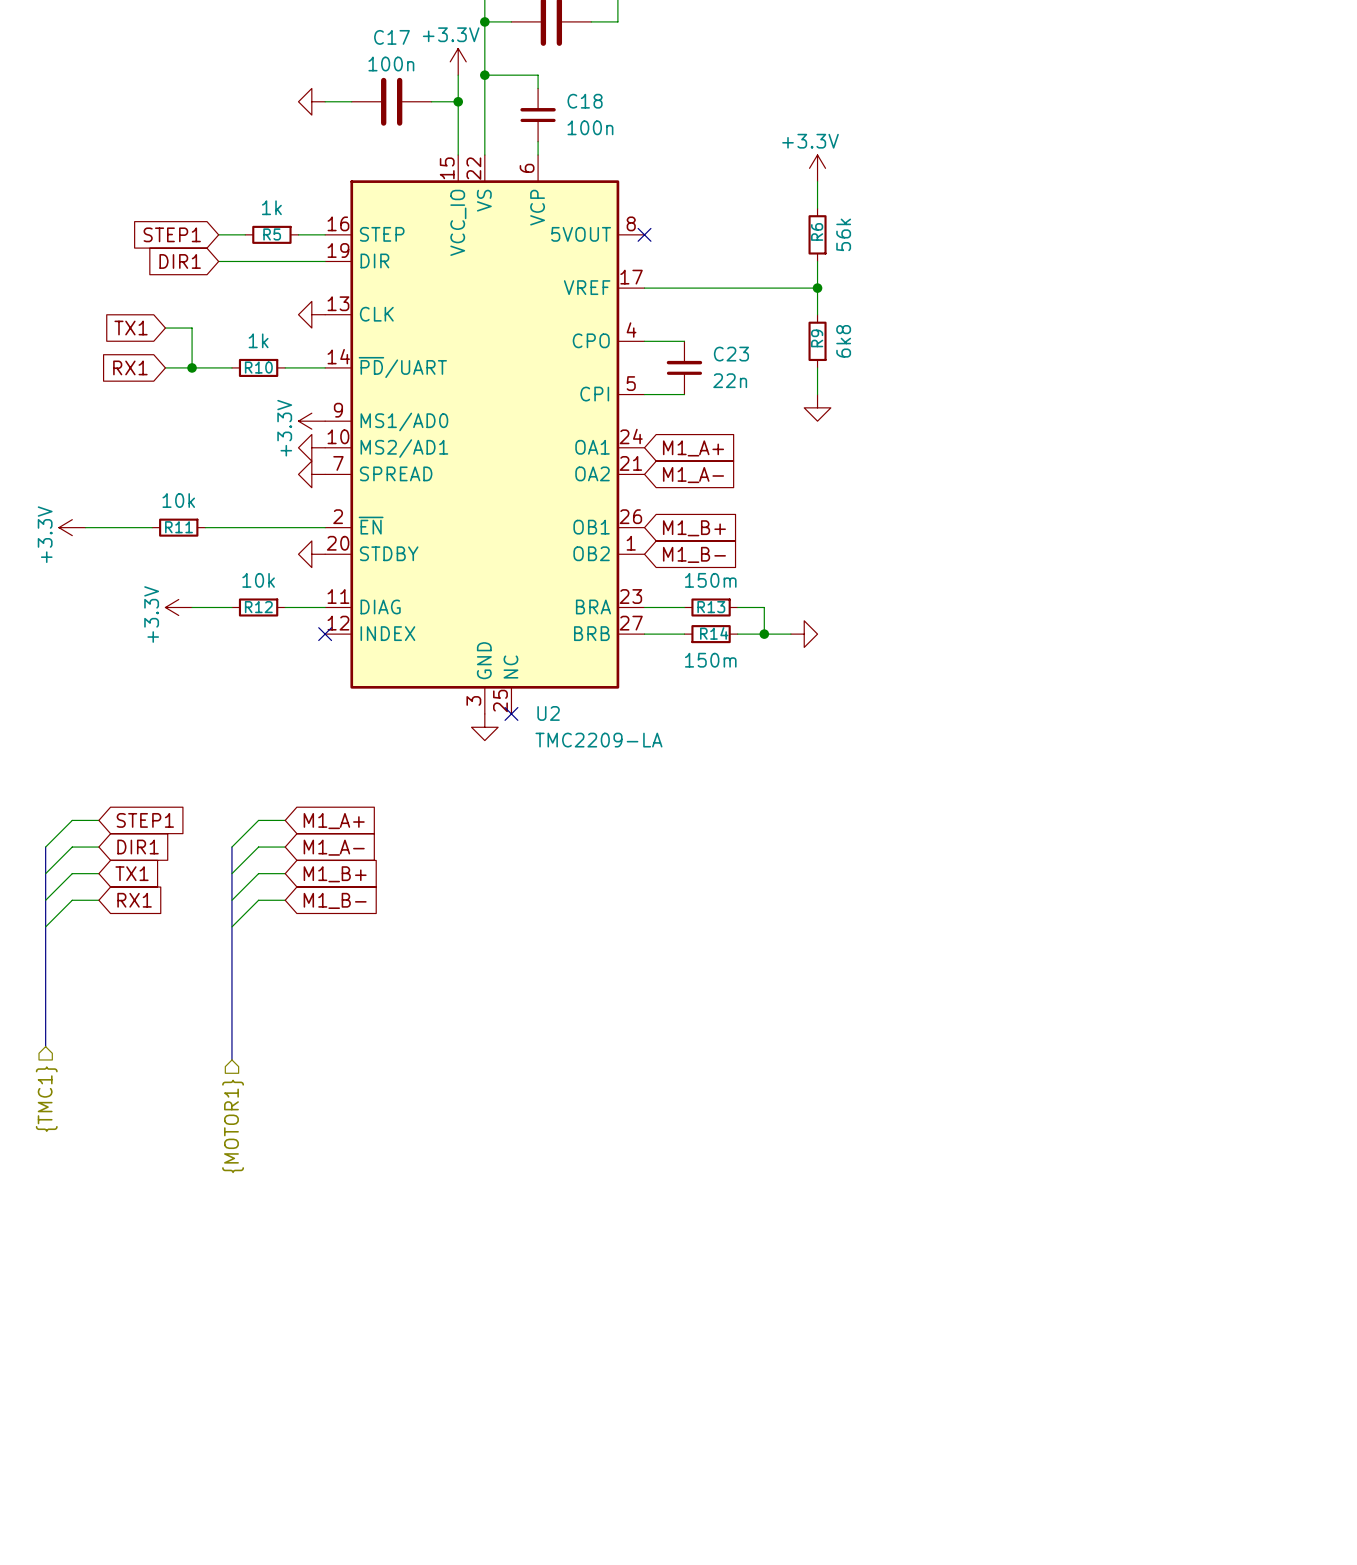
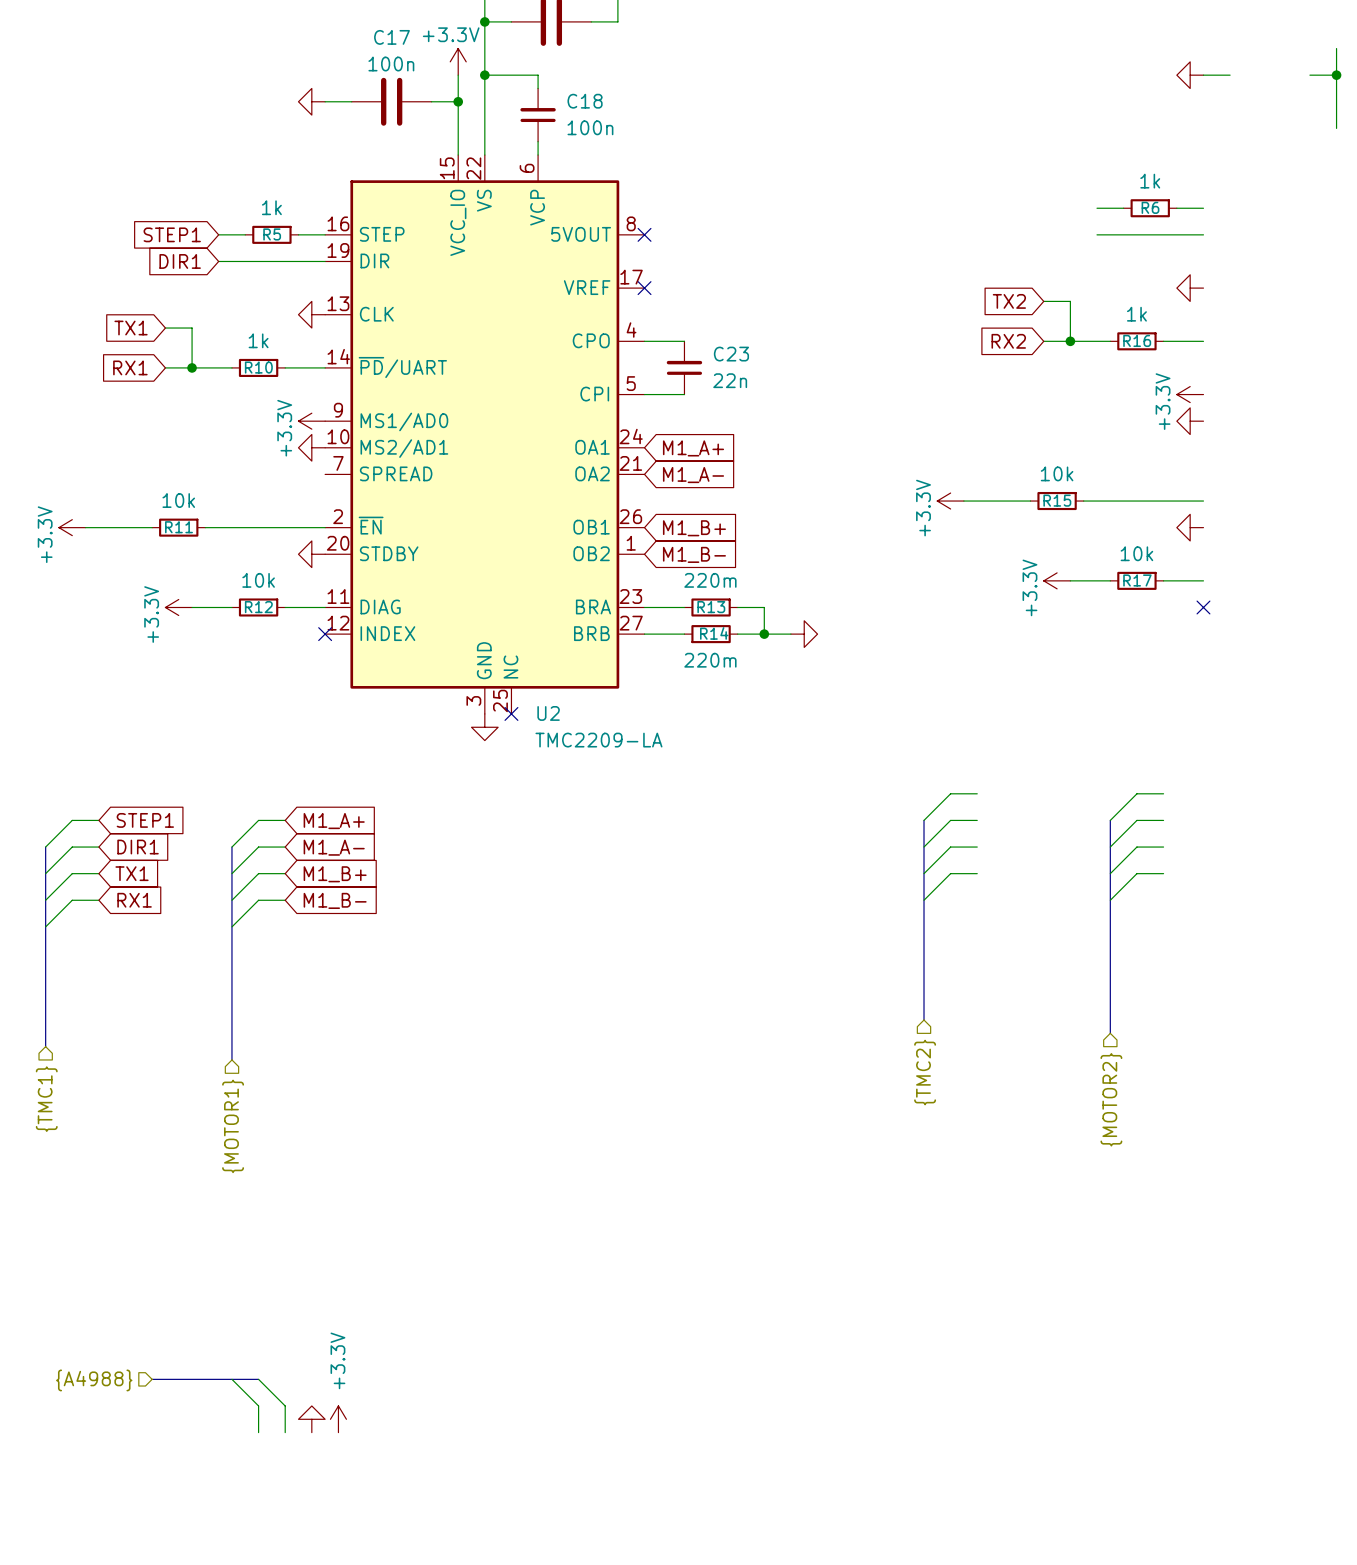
wire: none -> (1336, 48) (1336, 128)
power symbol: none -> (1190, 75)
wire: none -> (1203, 75) (1230, 75)
wire: none -> (1309, 75) (1336, 75)
junction: none -> (1336, 75)
power symbol: +3.3V (817, 168) -> none
wire: (817, 181) (817, 208) -> none
wire: none -> (1097, 208) (1123, 208)
wire: none -> (1176, 208) (1203, 208)
R6 rotation: 0° (817, 234) -> 90° clockwise (1150, 208)
R6 position: (817, 234) -> (1150, 208)
R6 value: 56k (843, 234) -> 1k (1150, 181)
wire: none -> (1097, 234) (1203, 234)
wire: (817, 261) (817, 314) -> none
wire: (644, 288) (817, 288) -> none
no-connect mark: none -> (644, 288)
junction: (817, 288) -> none
power symbol: none -> (1190, 288)
global label: none -> TX2 (1009, 301)
wire: none -> (1043, 301) (1070, 301) (1070, 341)
R9: 6k8 (817, 341) -> none
global label: none -> RX2 (1008, 341)
wire: none -> (1043, 341) (1110, 341)
junction: none -> (1070, 341)
R16: none -> 1k (1136, 341)
wire: none -> (1163, 341) (1203, 341)
wire: (817, 367) (817, 394) -> none
power symbol: none -> +3.3V (1190, 394)
power symbol: (817, 407) -> none
power symbol: none -> (1190, 421)
power symbol: (311, 474) -> none
power symbol: none -> +3.3V (950, 501)
wire: none -> (963, 501) (1030, 501)
R15: none -> 10k (1057, 501)
wire: none -> (1083, 501) (1203, 501)
power symbol: none -> (1190, 527)
R13 value: 150m (710, 580) -> 220m (710, 580)
power symbol: none -> +3.3V (1057, 580)
wire: none -> (1070, 580) (1110, 580)
R17: none -> 10k (1136, 580)
wire: none -> (1163, 580) (1203, 580)
no-connect mark: none -> (1203, 607)
R14 value: 150m (710, 660) -> 220m (710, 660)
wire: none -> (977, 793) (950, 793) (924, 820)
wire: none -> (1163, 793) (1136, 793) (1110, 820)
bus: none -> (924, 820) (924, 1020)
wire: none -> (977, 820) (950, 820) (924, 847)
bus: none -> (1110, 820) (1110, 1033)
wire: none -> (1163, 820) (1136, 820) (1110, 847)
wire: none -> (977, 847) (950, 847) (924, 873)
wire: none -> (1163, 847) (1136, 847) (1110, 873)
wire: none -> (977, 873) (950, 873) (924, 900)
wire: none -> (1163, 873) (1136, 873) (1110, 900)
hierarchical label: none -> {TMC2} (925, 1072)
hierarchical label: none -> {MOTOR2} (1111, 1099)
bus: none -> (152, 1379) (258, 1379)
wire: none -> (231, 1379) (258, 1405) (258, 1432)
wire: none -> (258, 1379) (285, 1405) (285, 1432)
hierarchical label: none -> {A4988} (94, 1380)
power symbol: none -> (311, 1419)
power symbol: none -> +3.3V (338, 1419)

